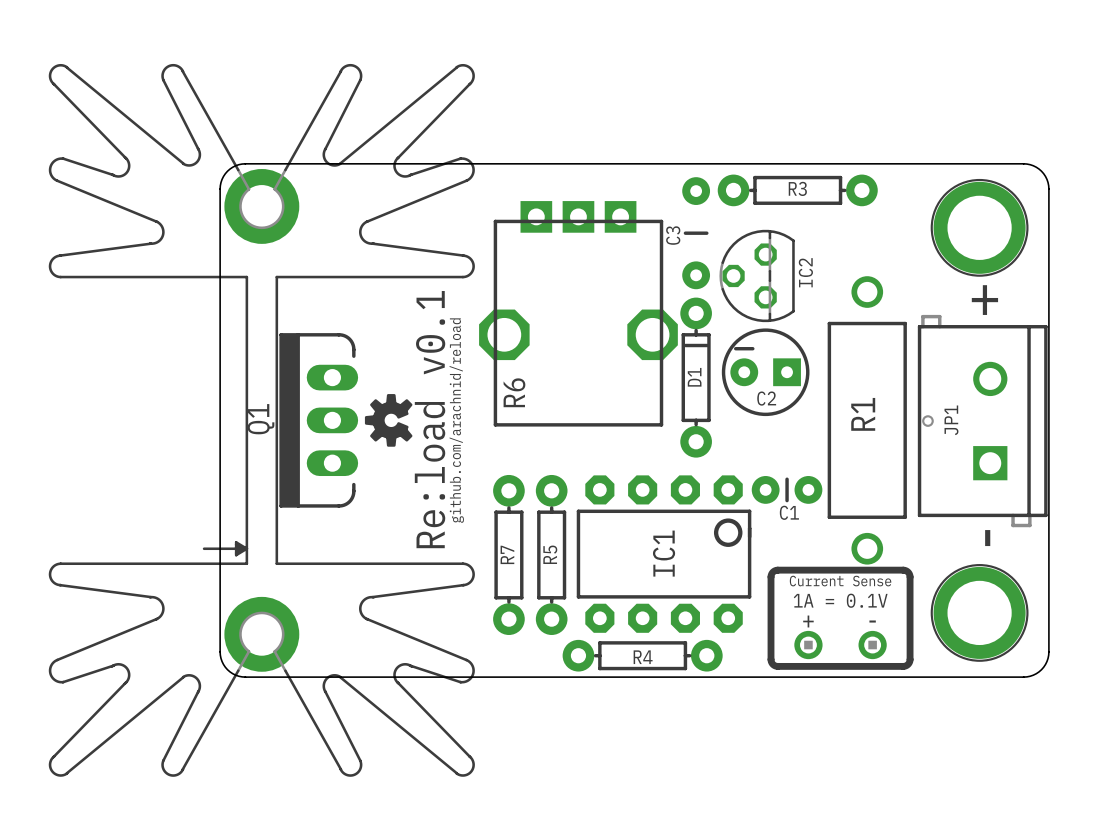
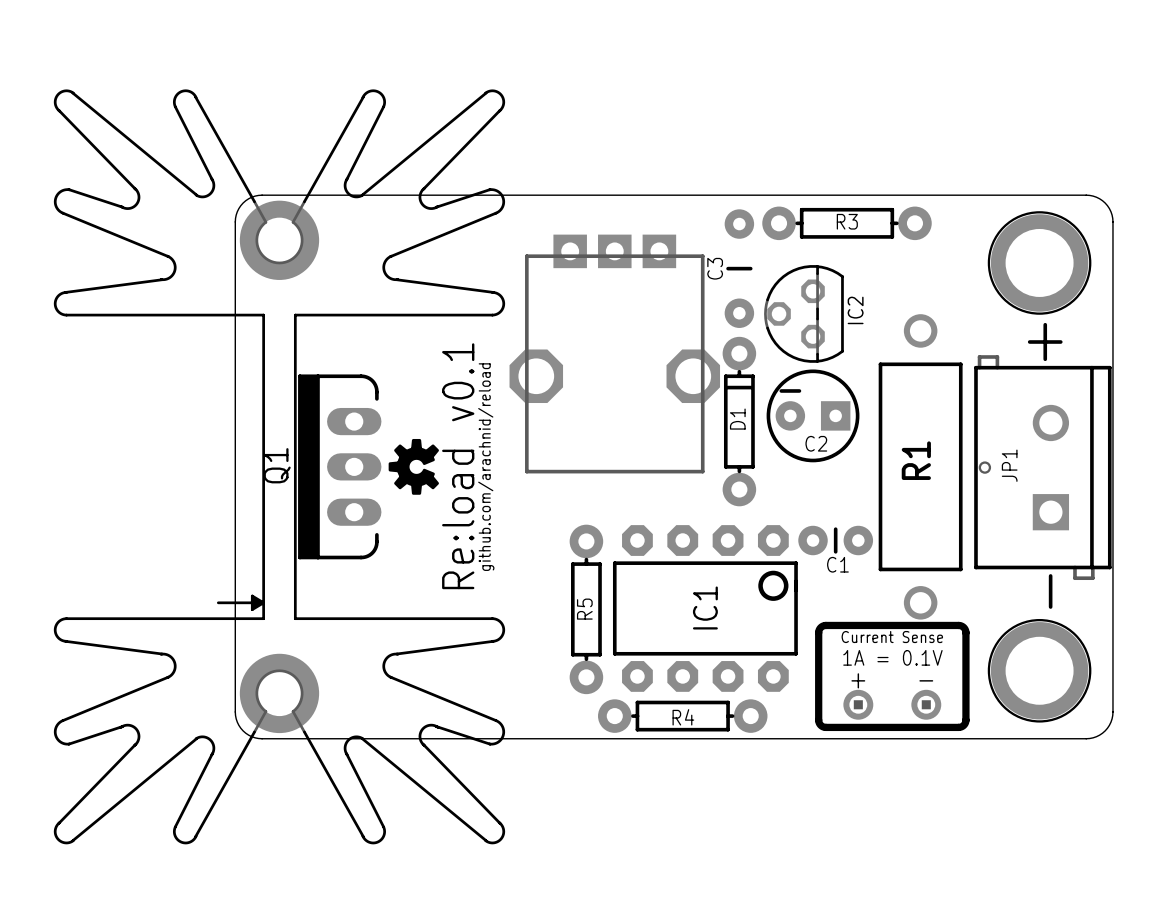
R6: (578, 313) -> none
part: none -> (614, 354)
R7: (508, 554) -> none

